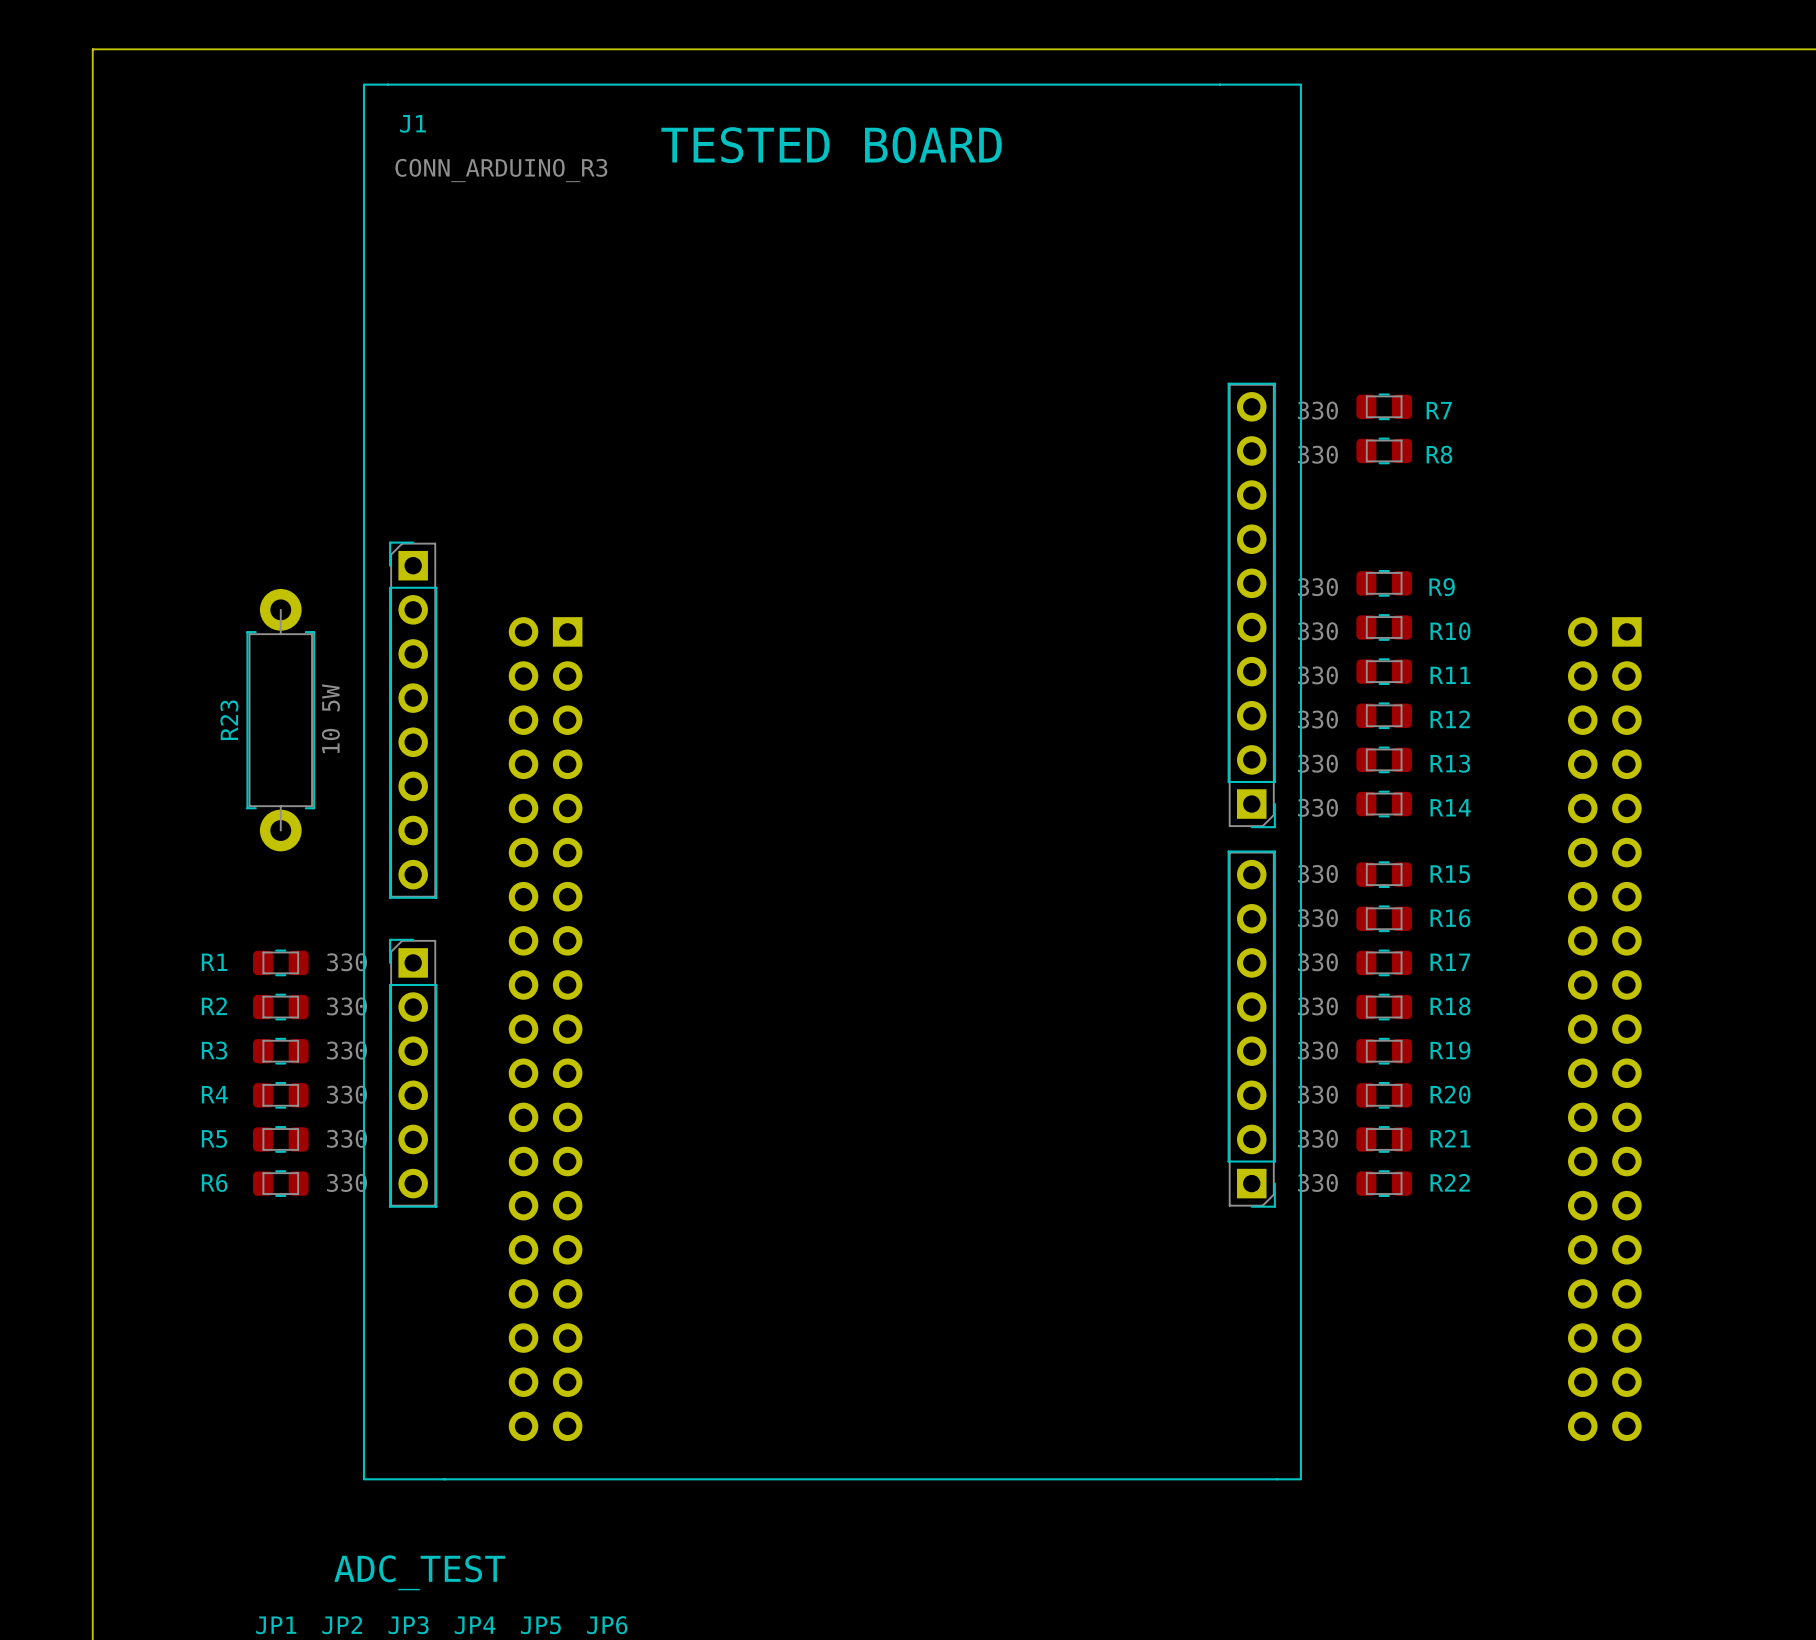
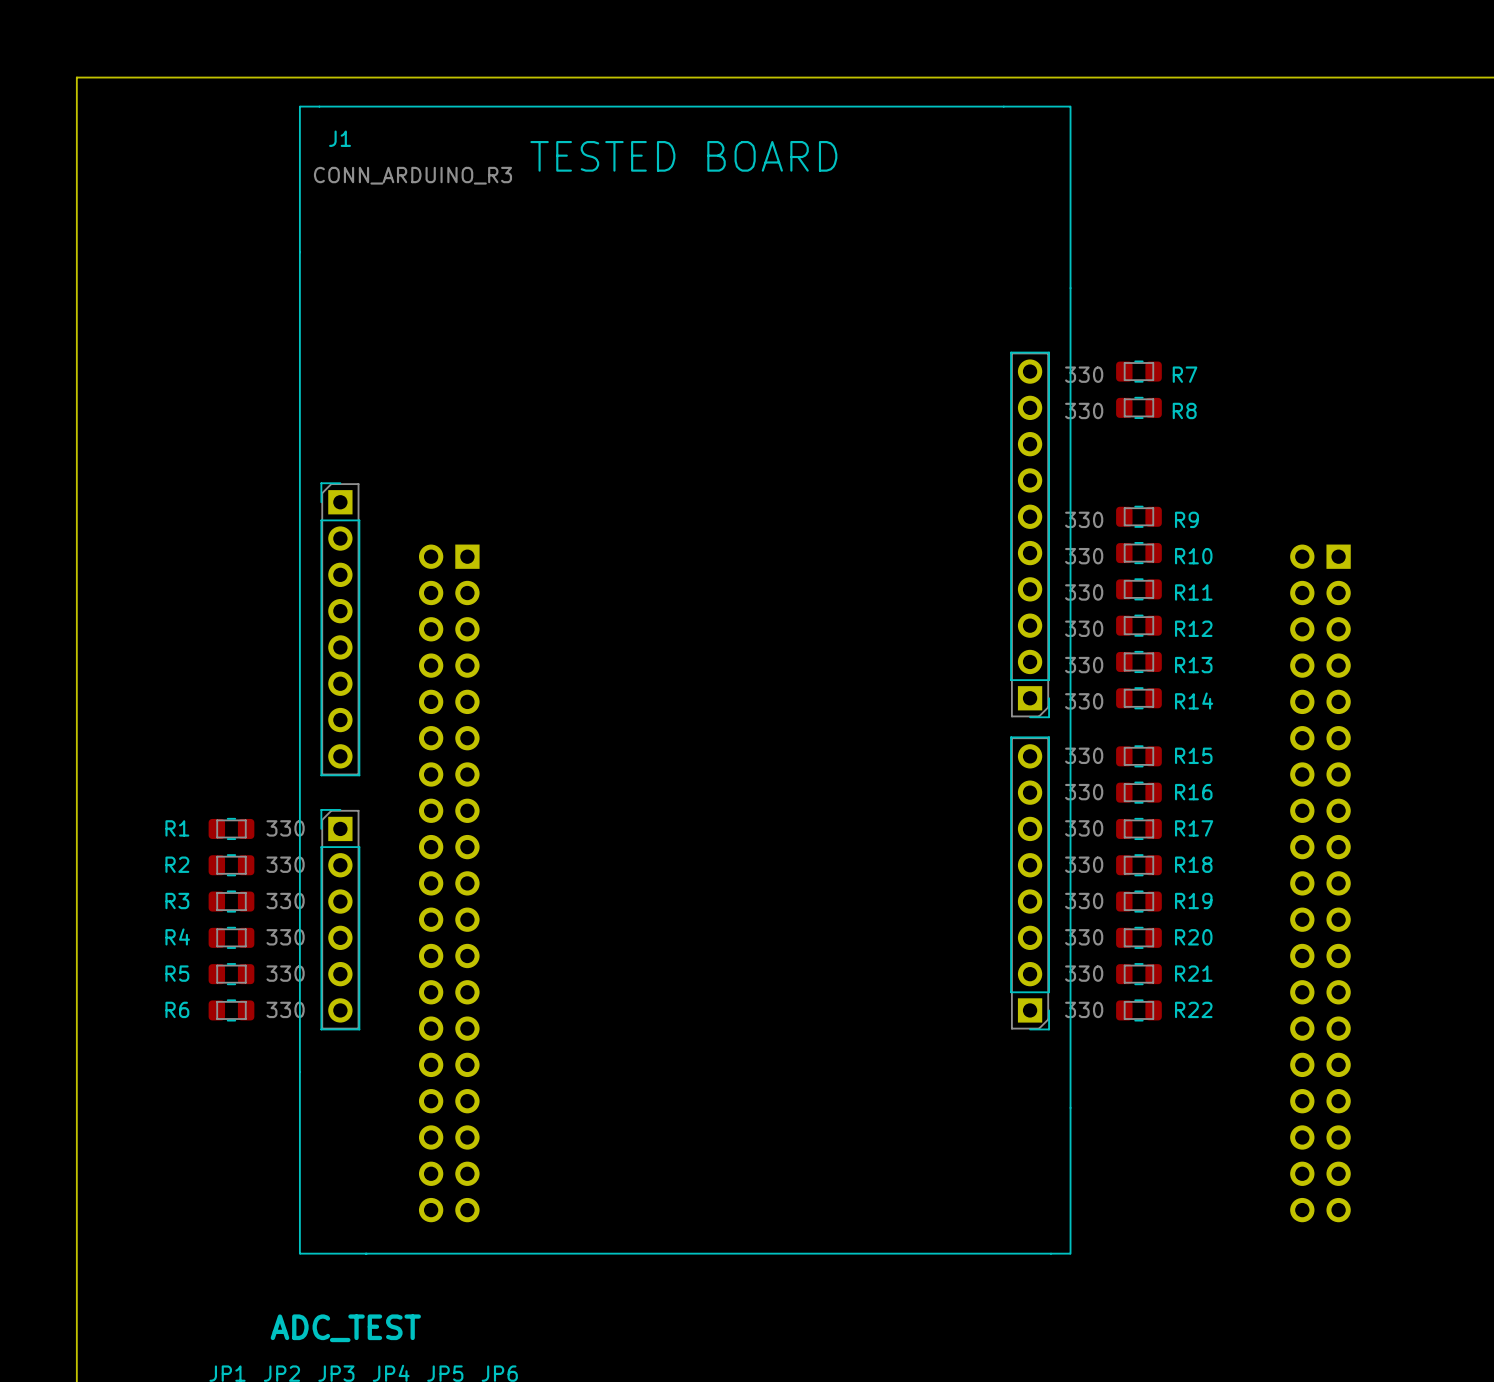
R23: 10 5W (280, 720) -> none

